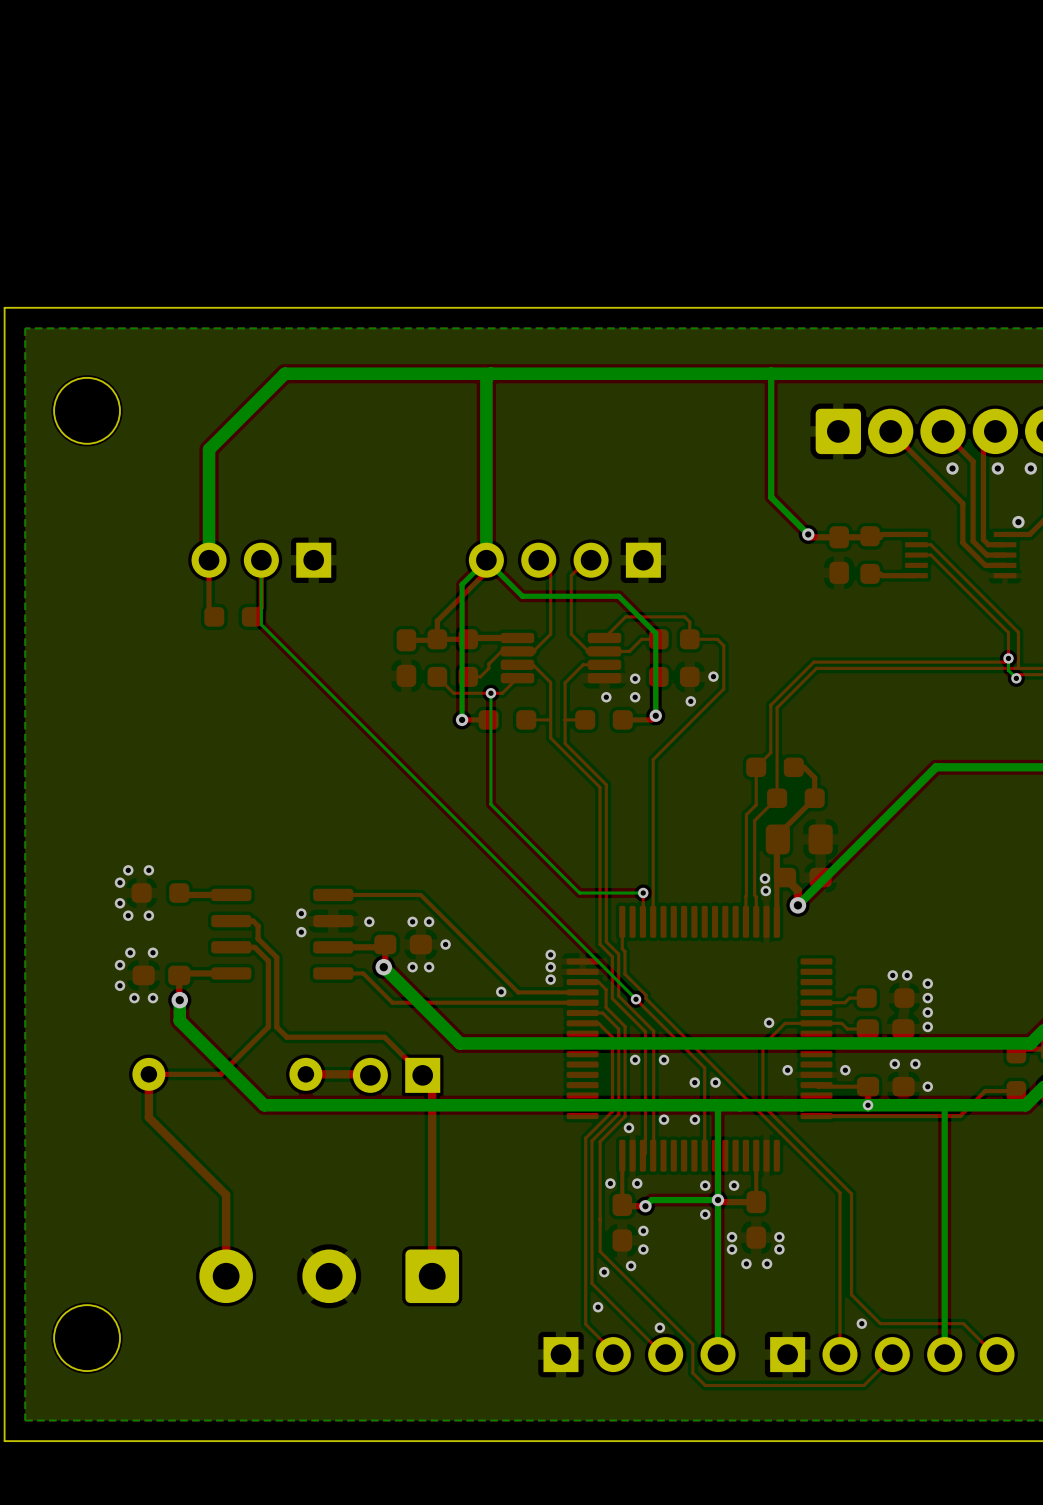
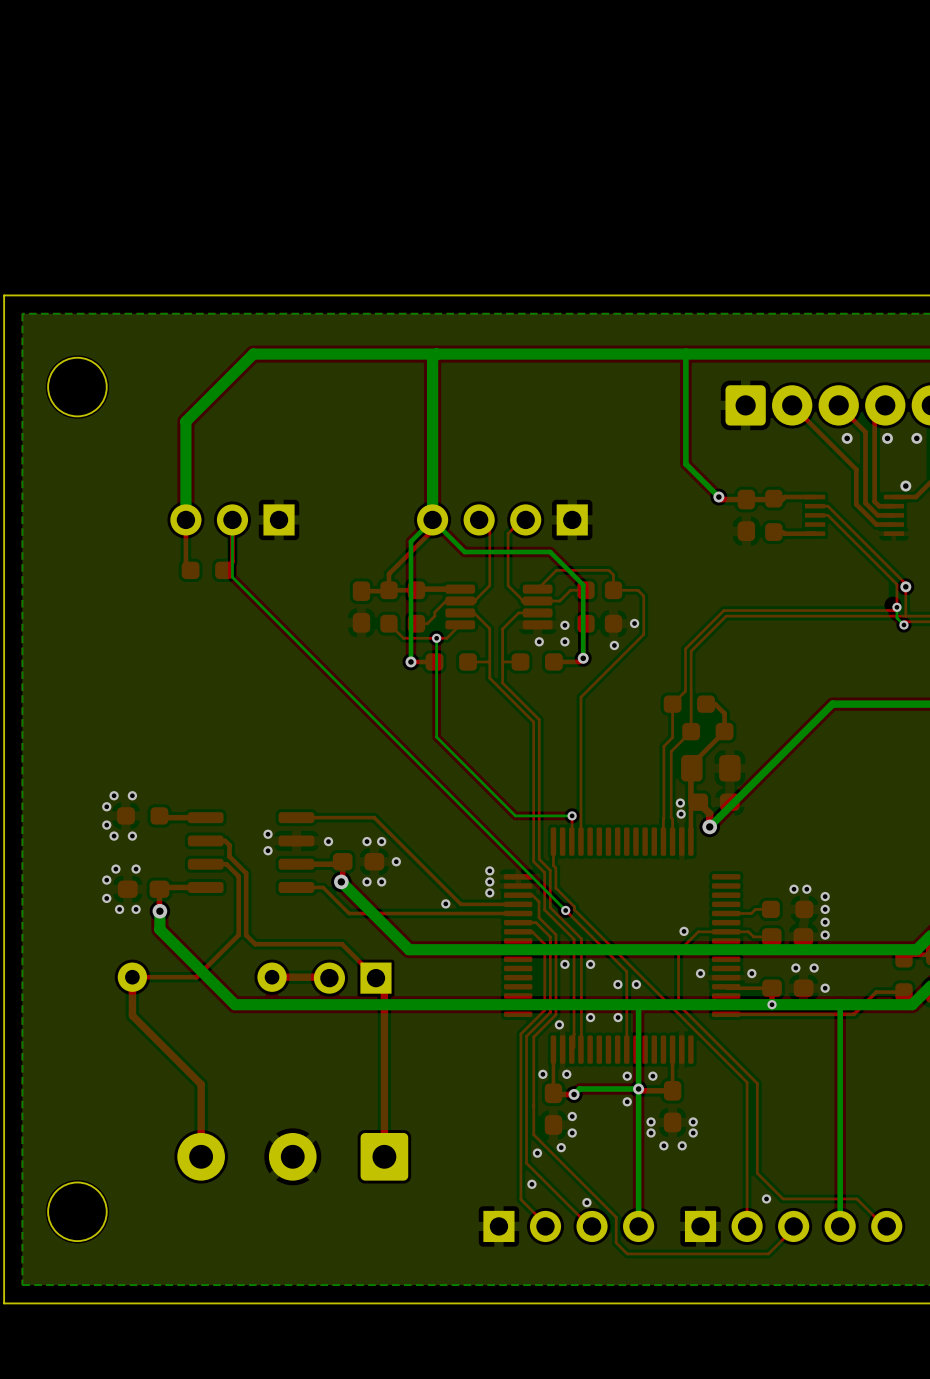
via: none -> (905, 586)

